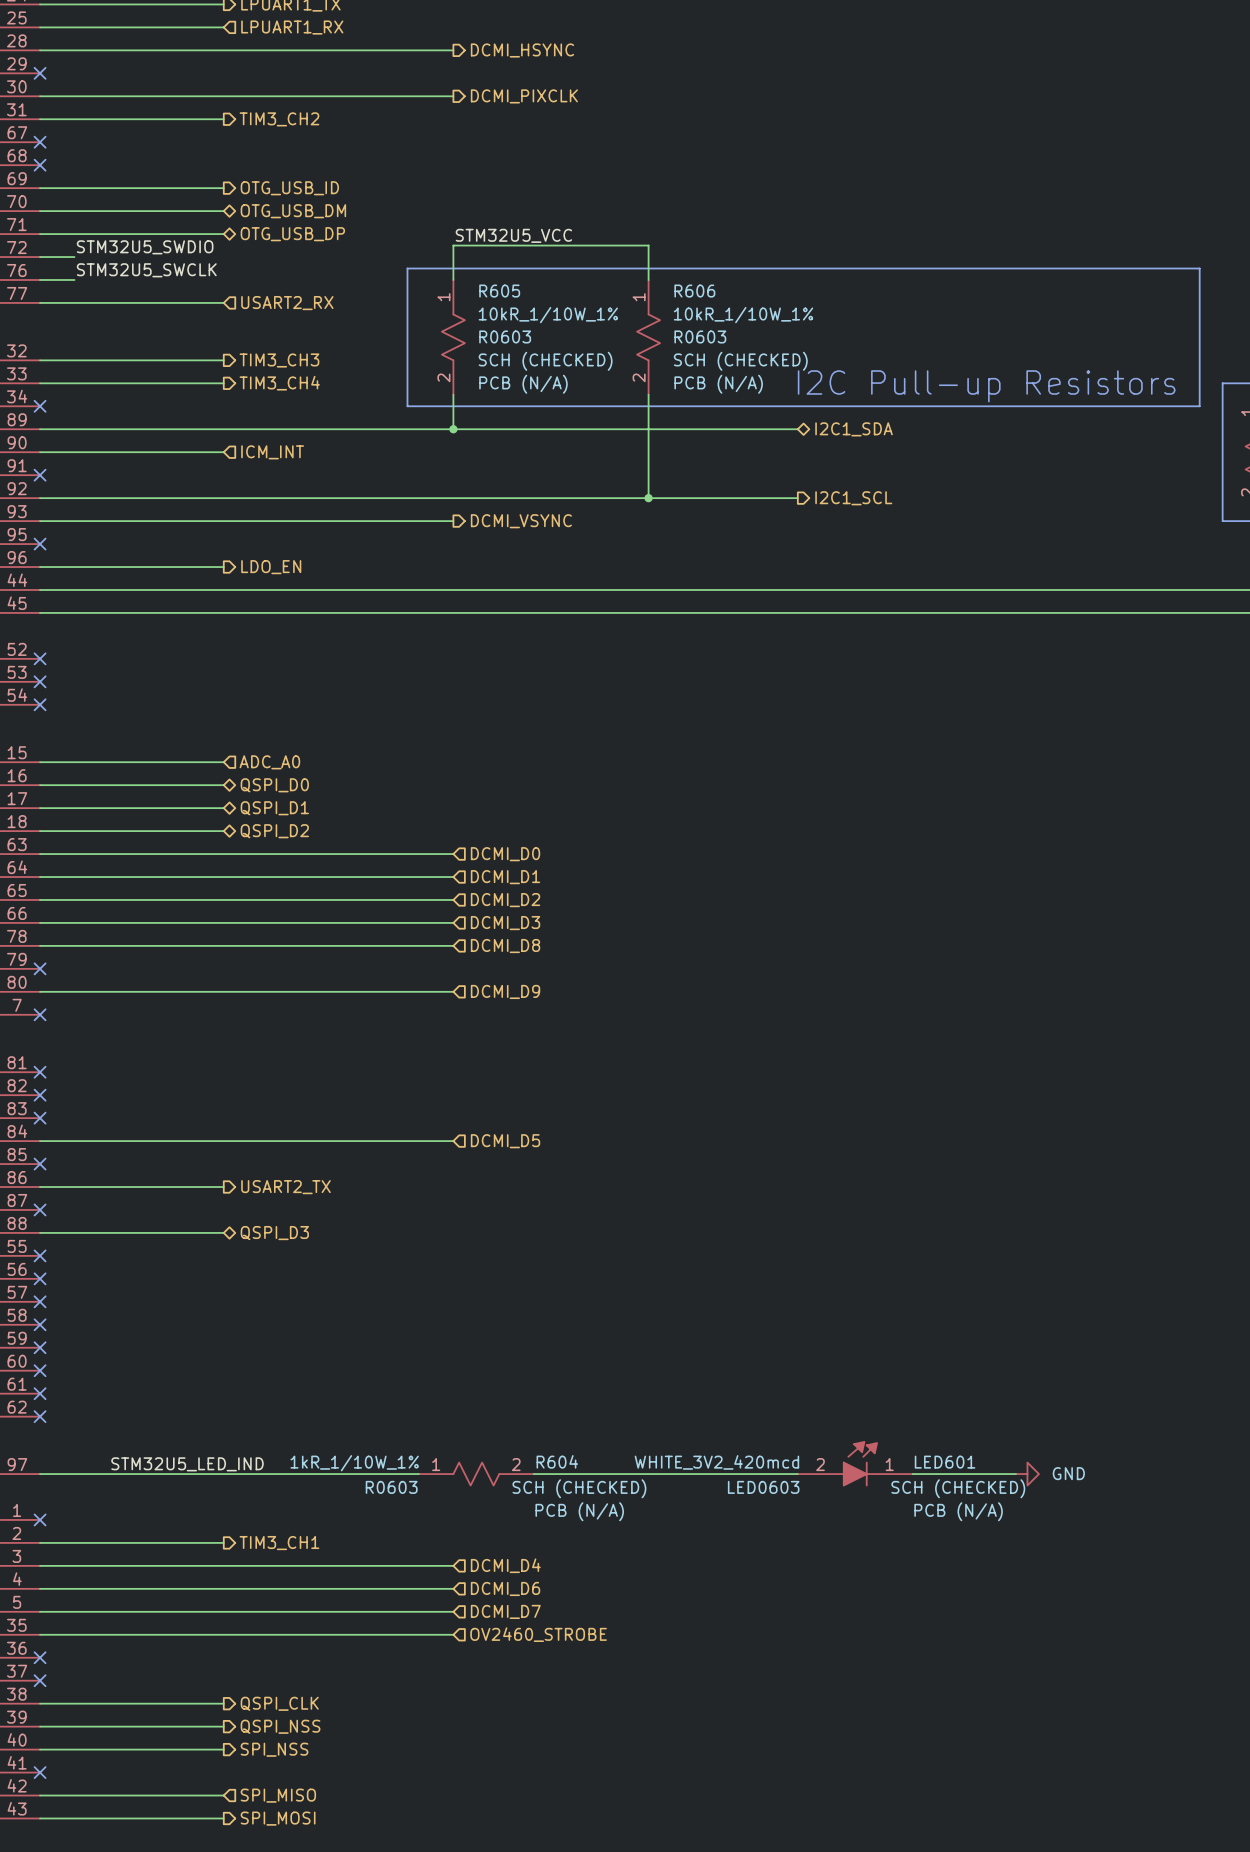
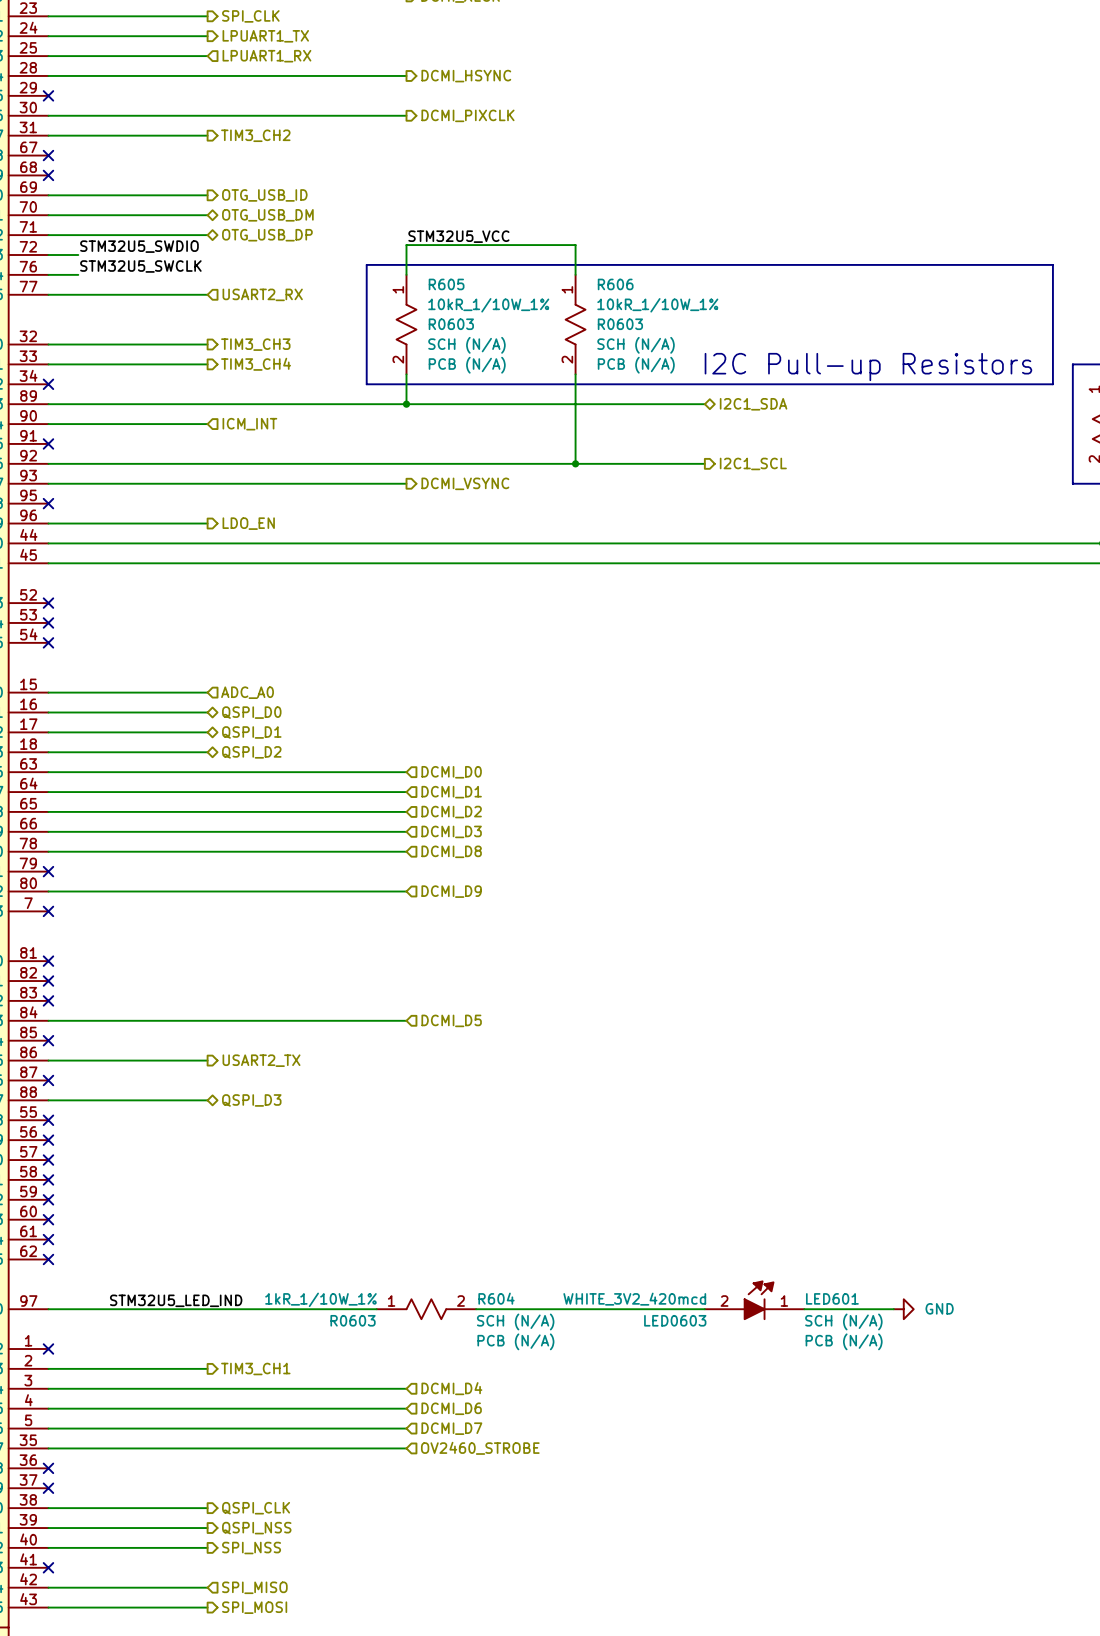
R605 text: SCH (CHECKED) (545, 361) -> SCH (N/A) (466, 345)
R606 text: SCH (CHECKED) (740, 361) -> SCH (N/A) (636, 345)
R604 text: SCH (CHECKED) (579, 1488) -> SCH (N/A) (515, 1321)
LED601 text: SCH (CHECKED) (958, 1488) -> SCH (N/A) (843, 1321)

